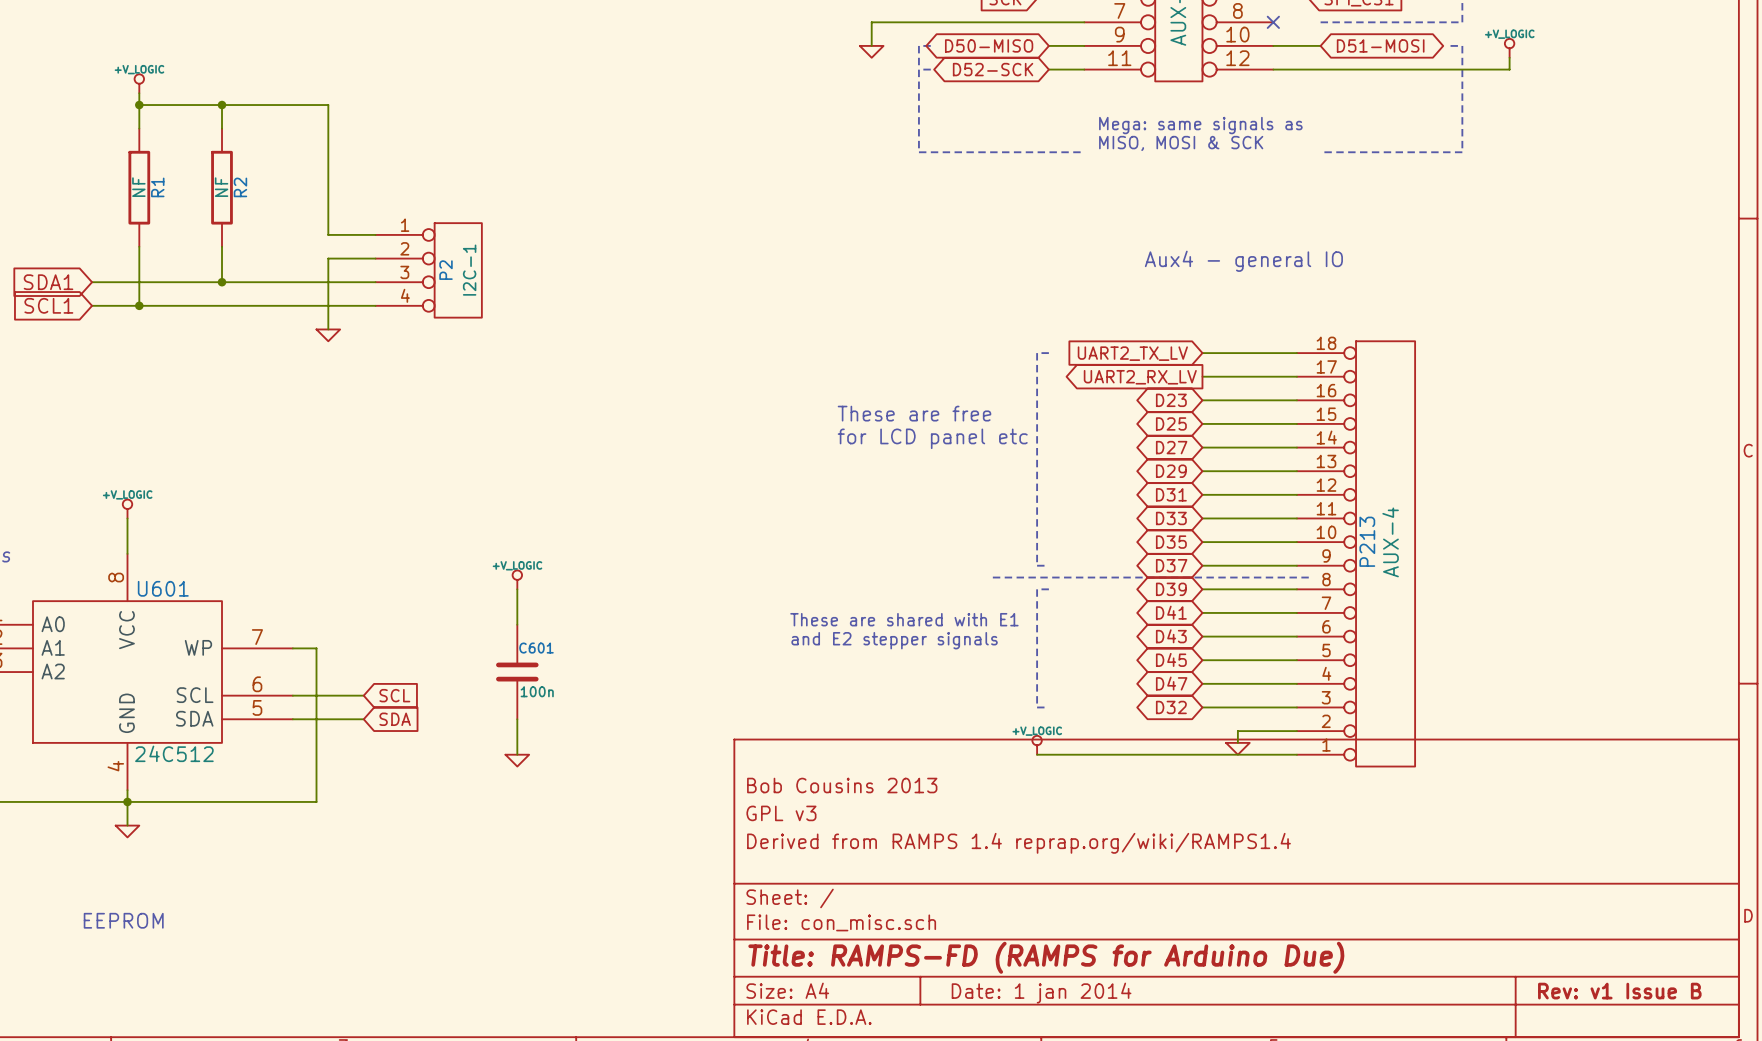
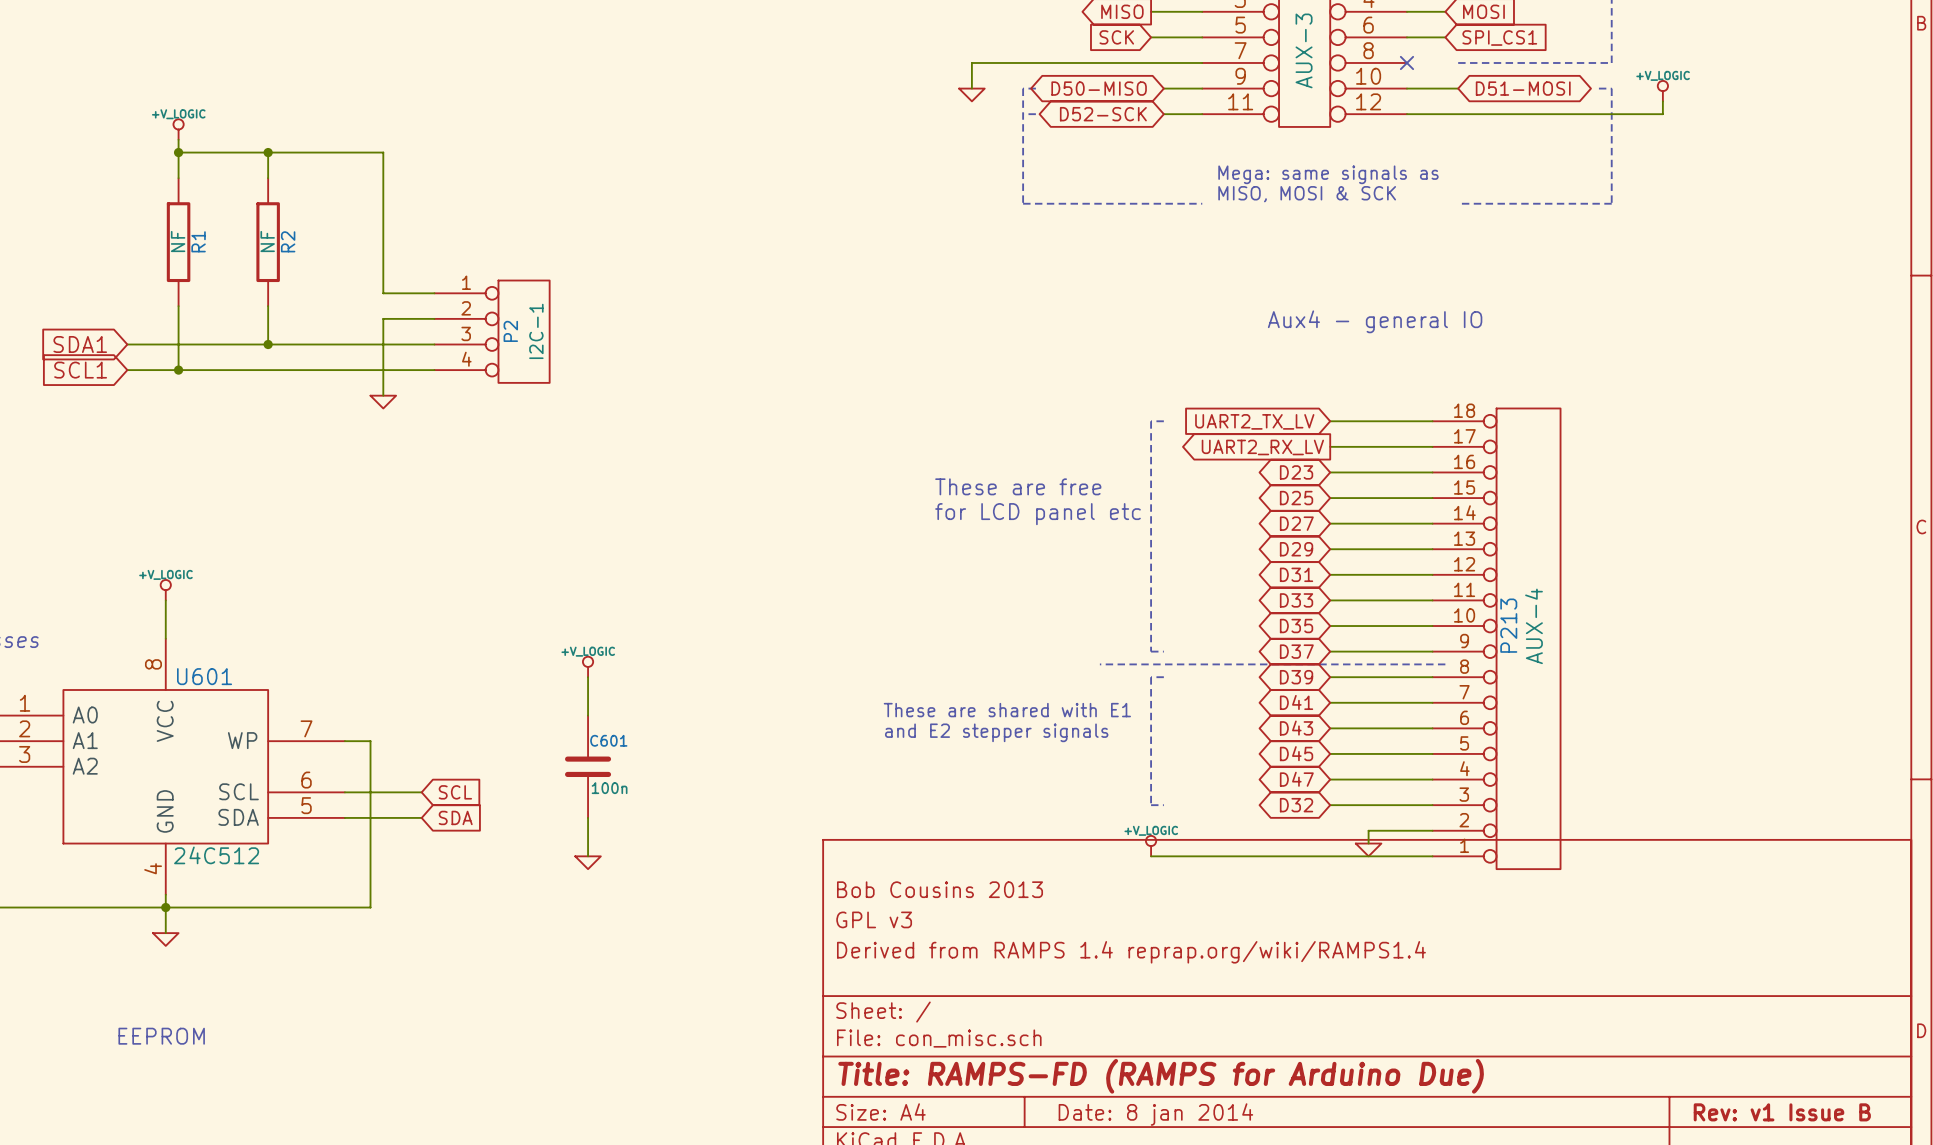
title block: Date: 1 jan 2014 (1041, 993) -> Date: 8 jan 2014 (1155, 1114)

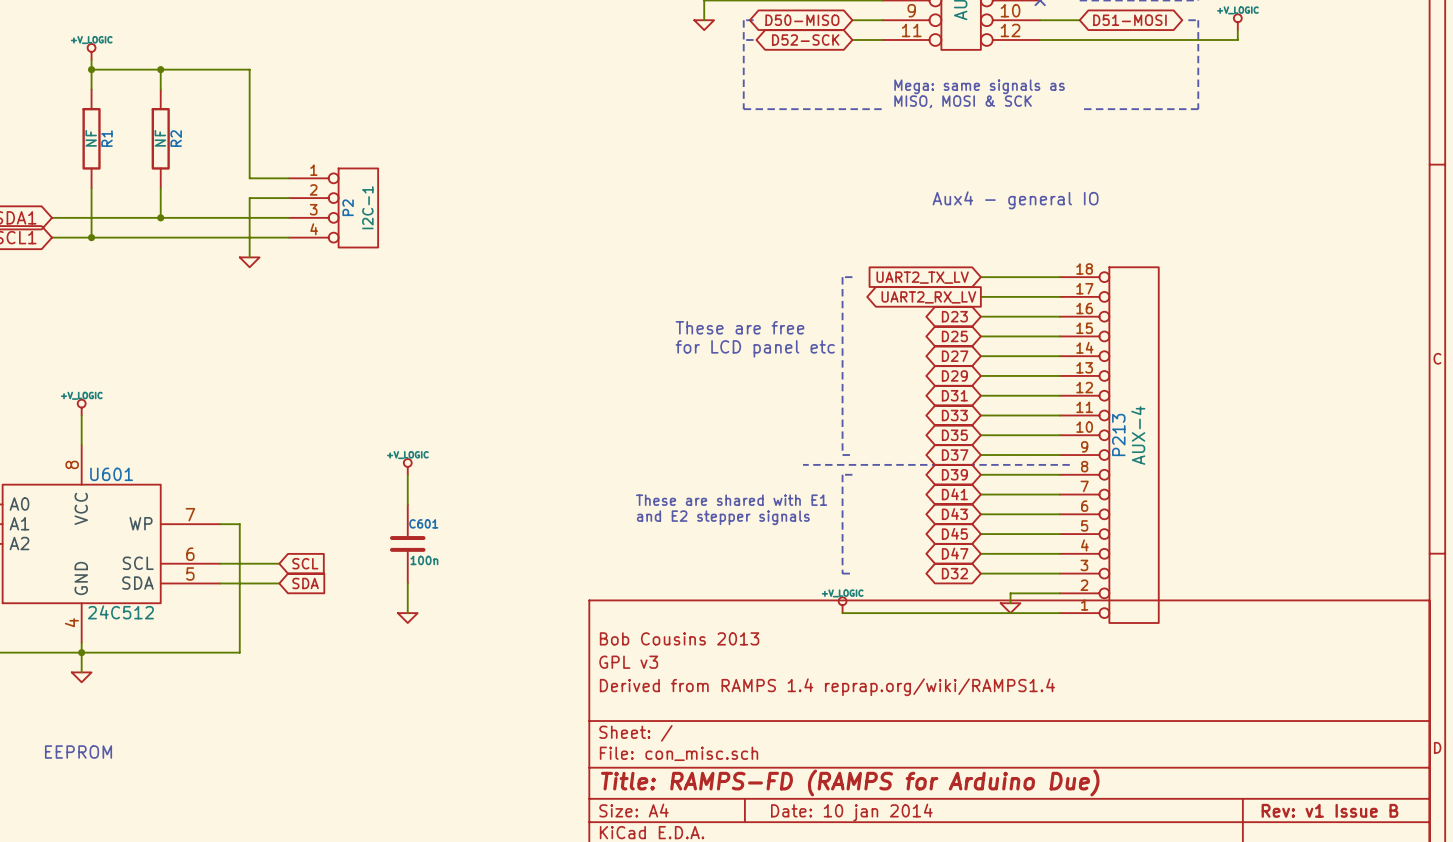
title block: Date: 8 jan 2014 (1155, 1114) -> Date: 10 jan 2014 (851, 812)

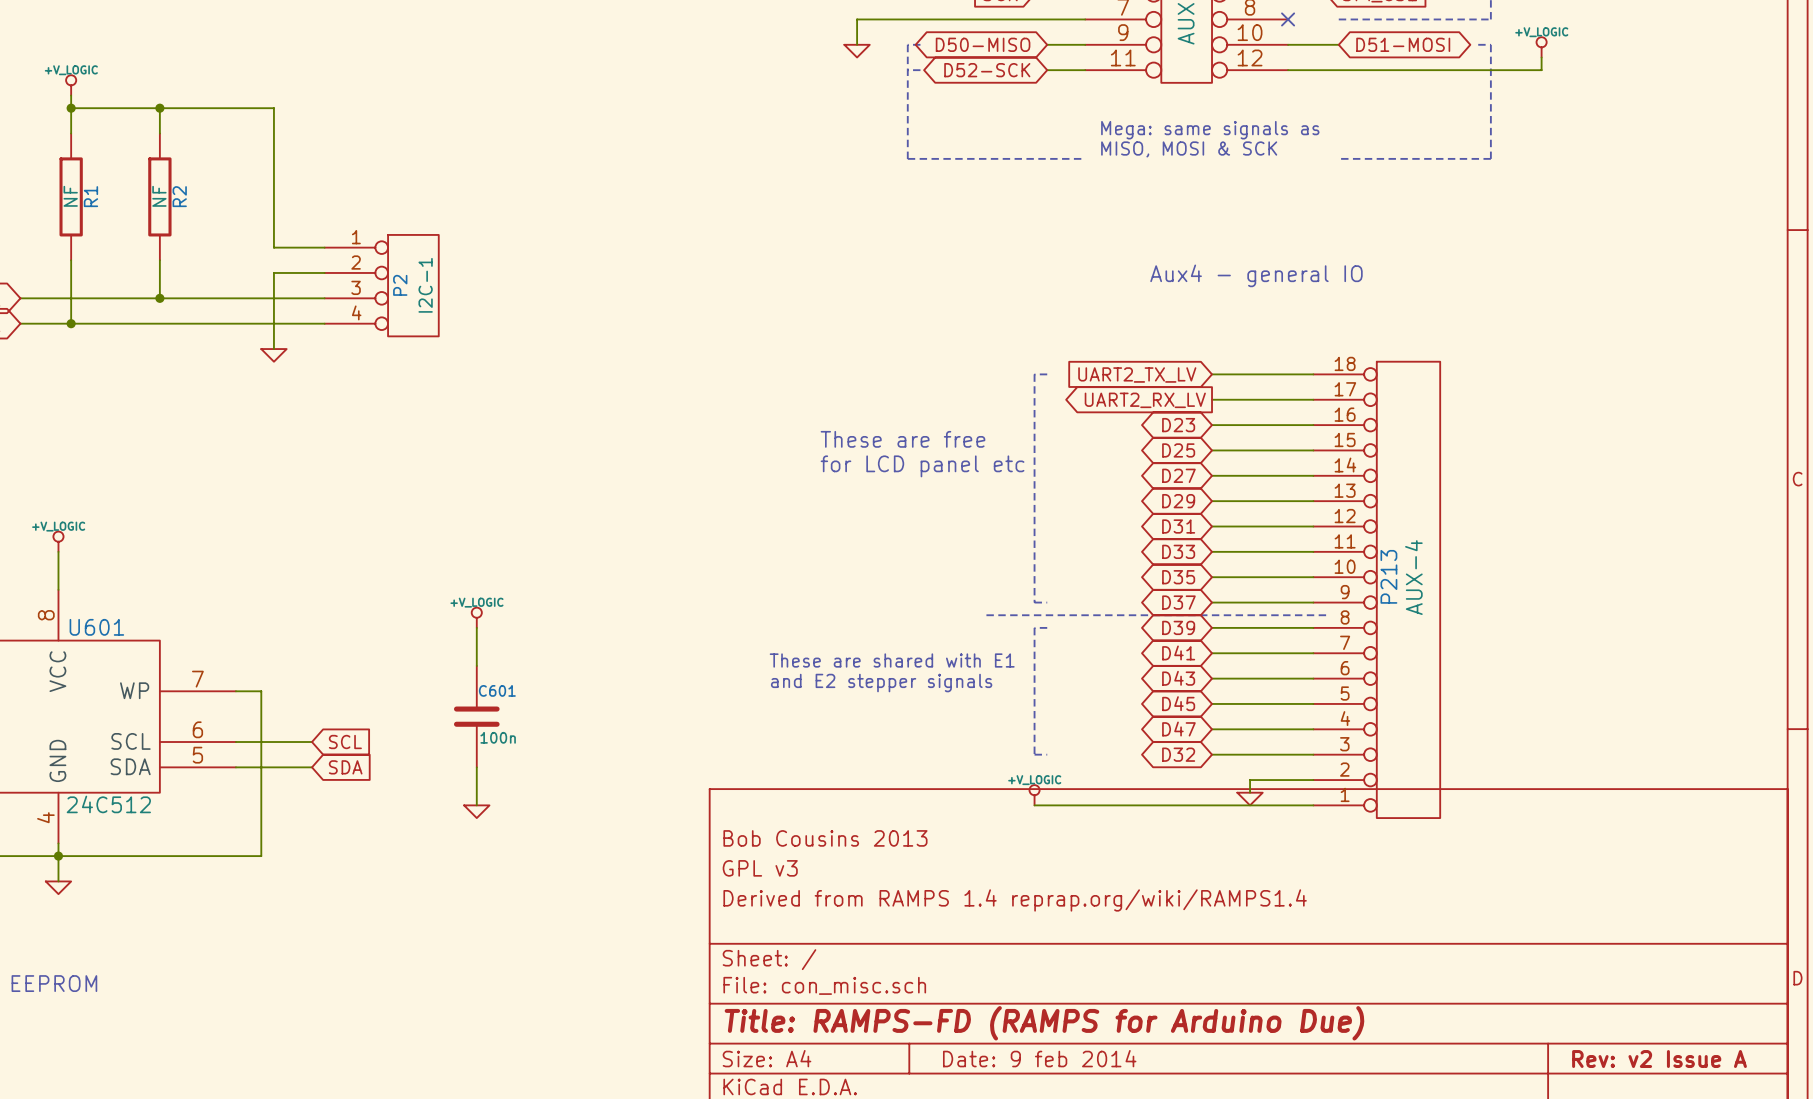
title block: Rev: v1 Issue B (1330, 810) -> Rev: v2 Issue A (1659, 1059)
title block: Date: 10 jan 2014 (851, 812) -> Date: 9 feb 2014 (1039, 1058)

